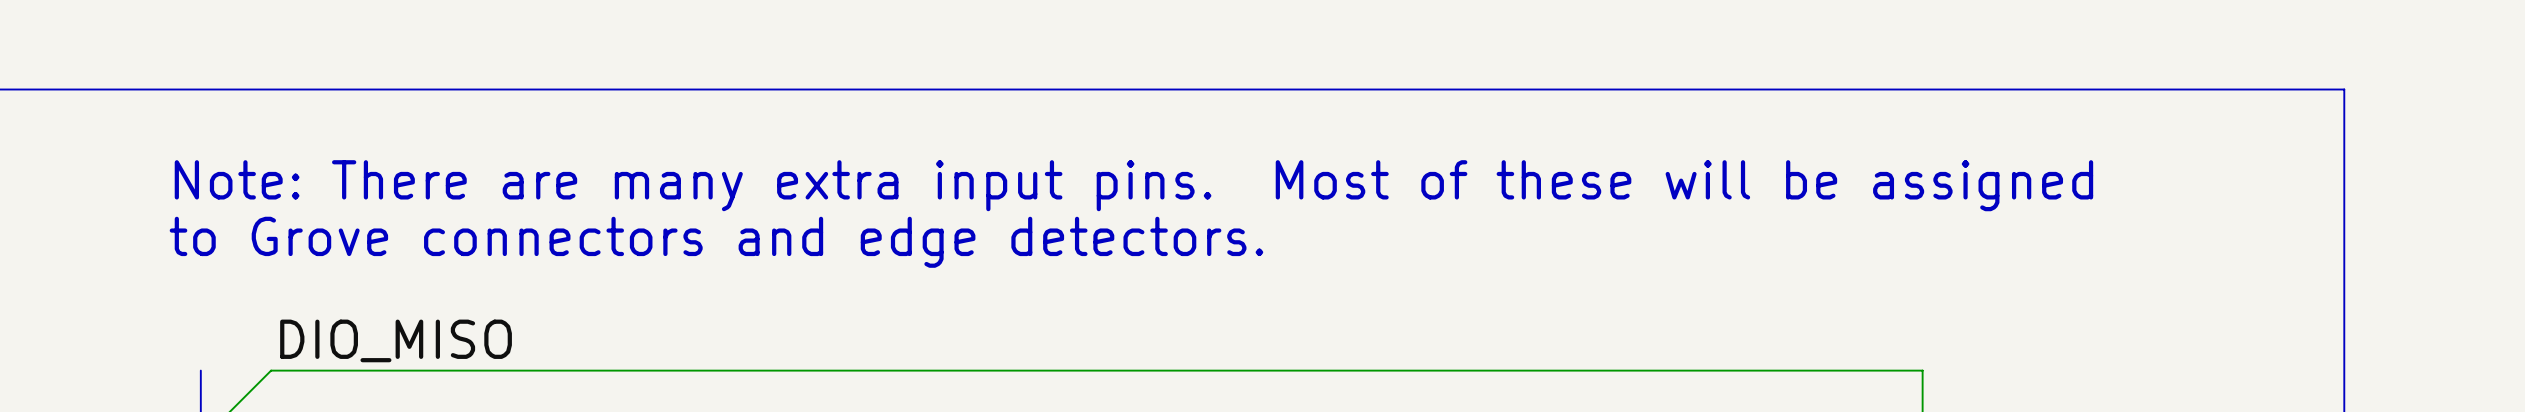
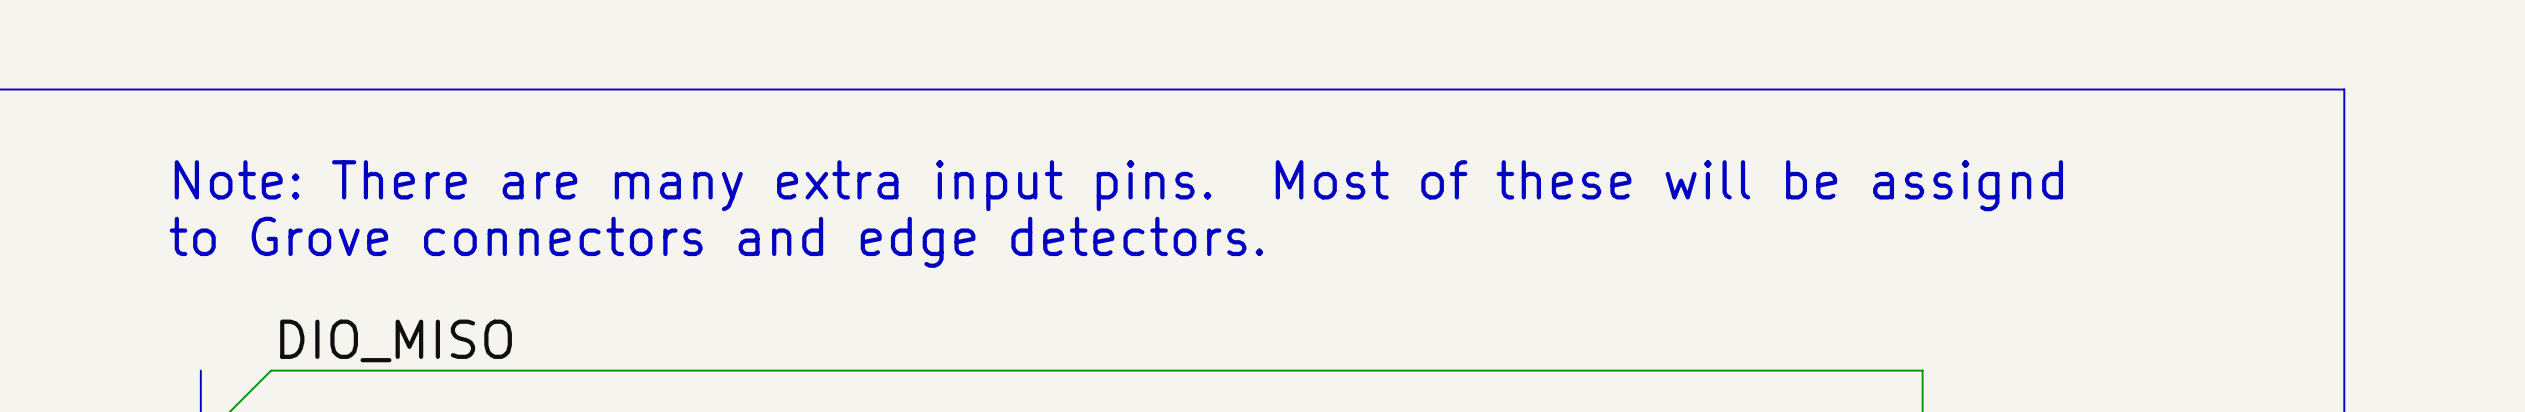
text: Note: There are many extra input pins. Most of these will be assigned (1133, 185) -> Note: There are many extra input pins. Most of these will be assignd (1118, 185)

